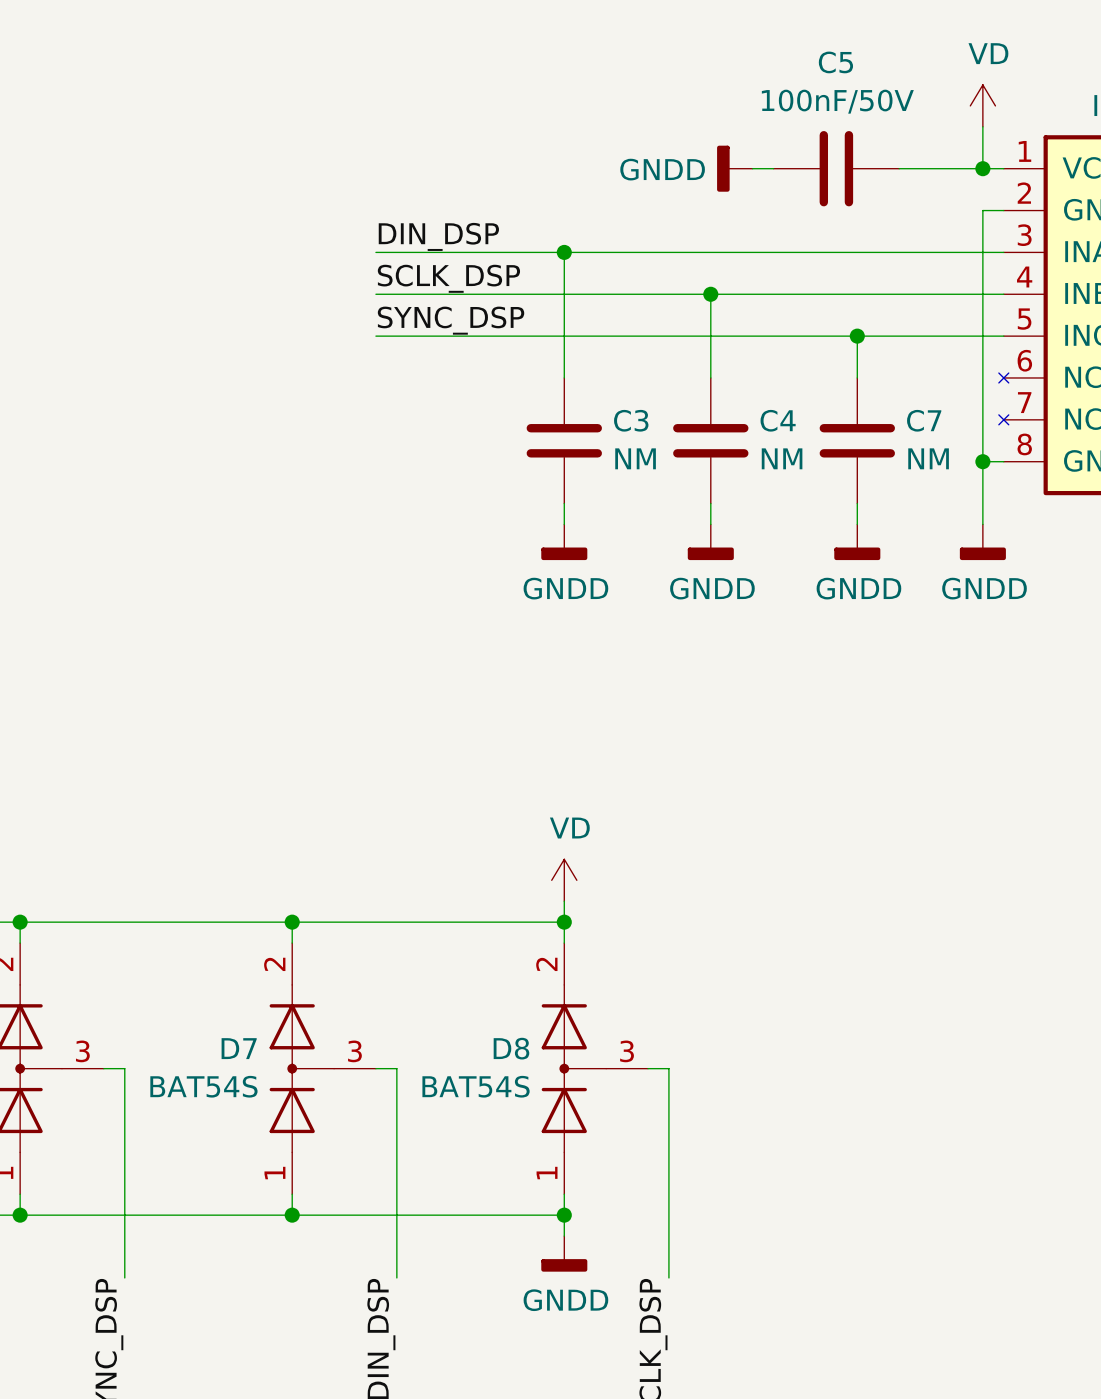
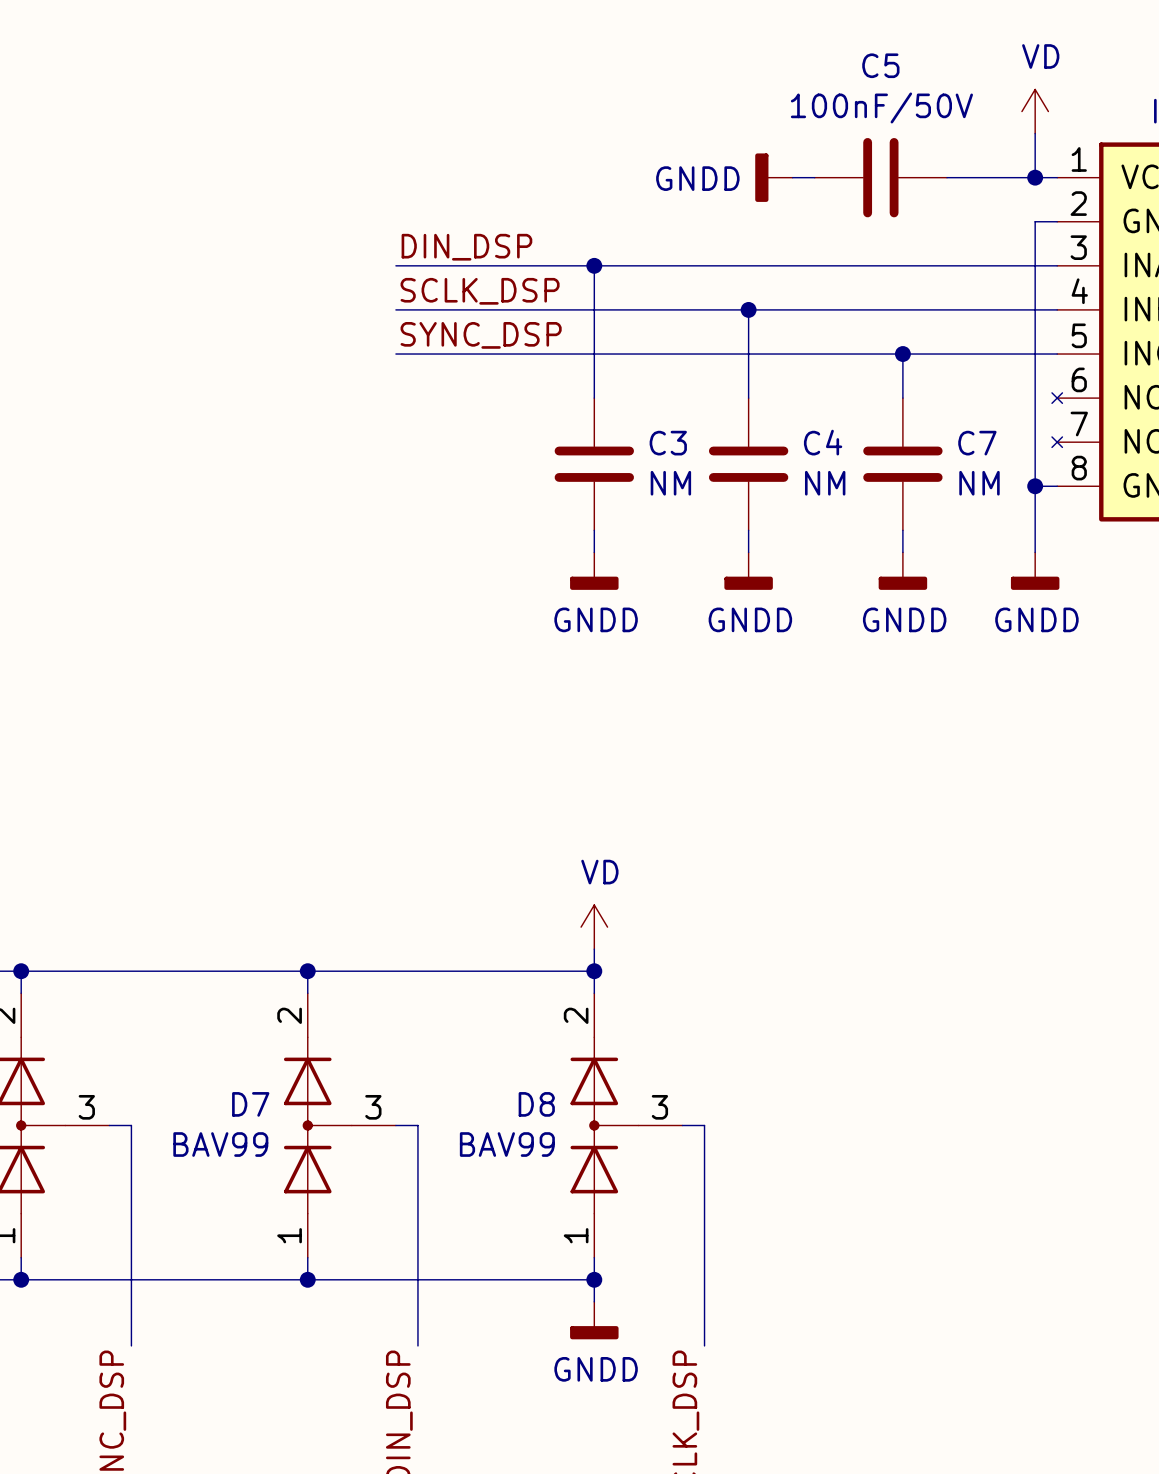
D7 value: BAT54S (203, 1086) -> BAV99 (220, 1144)
D8 value: BAT54S (476, 1086) -> BAV99 (507, 1144)

